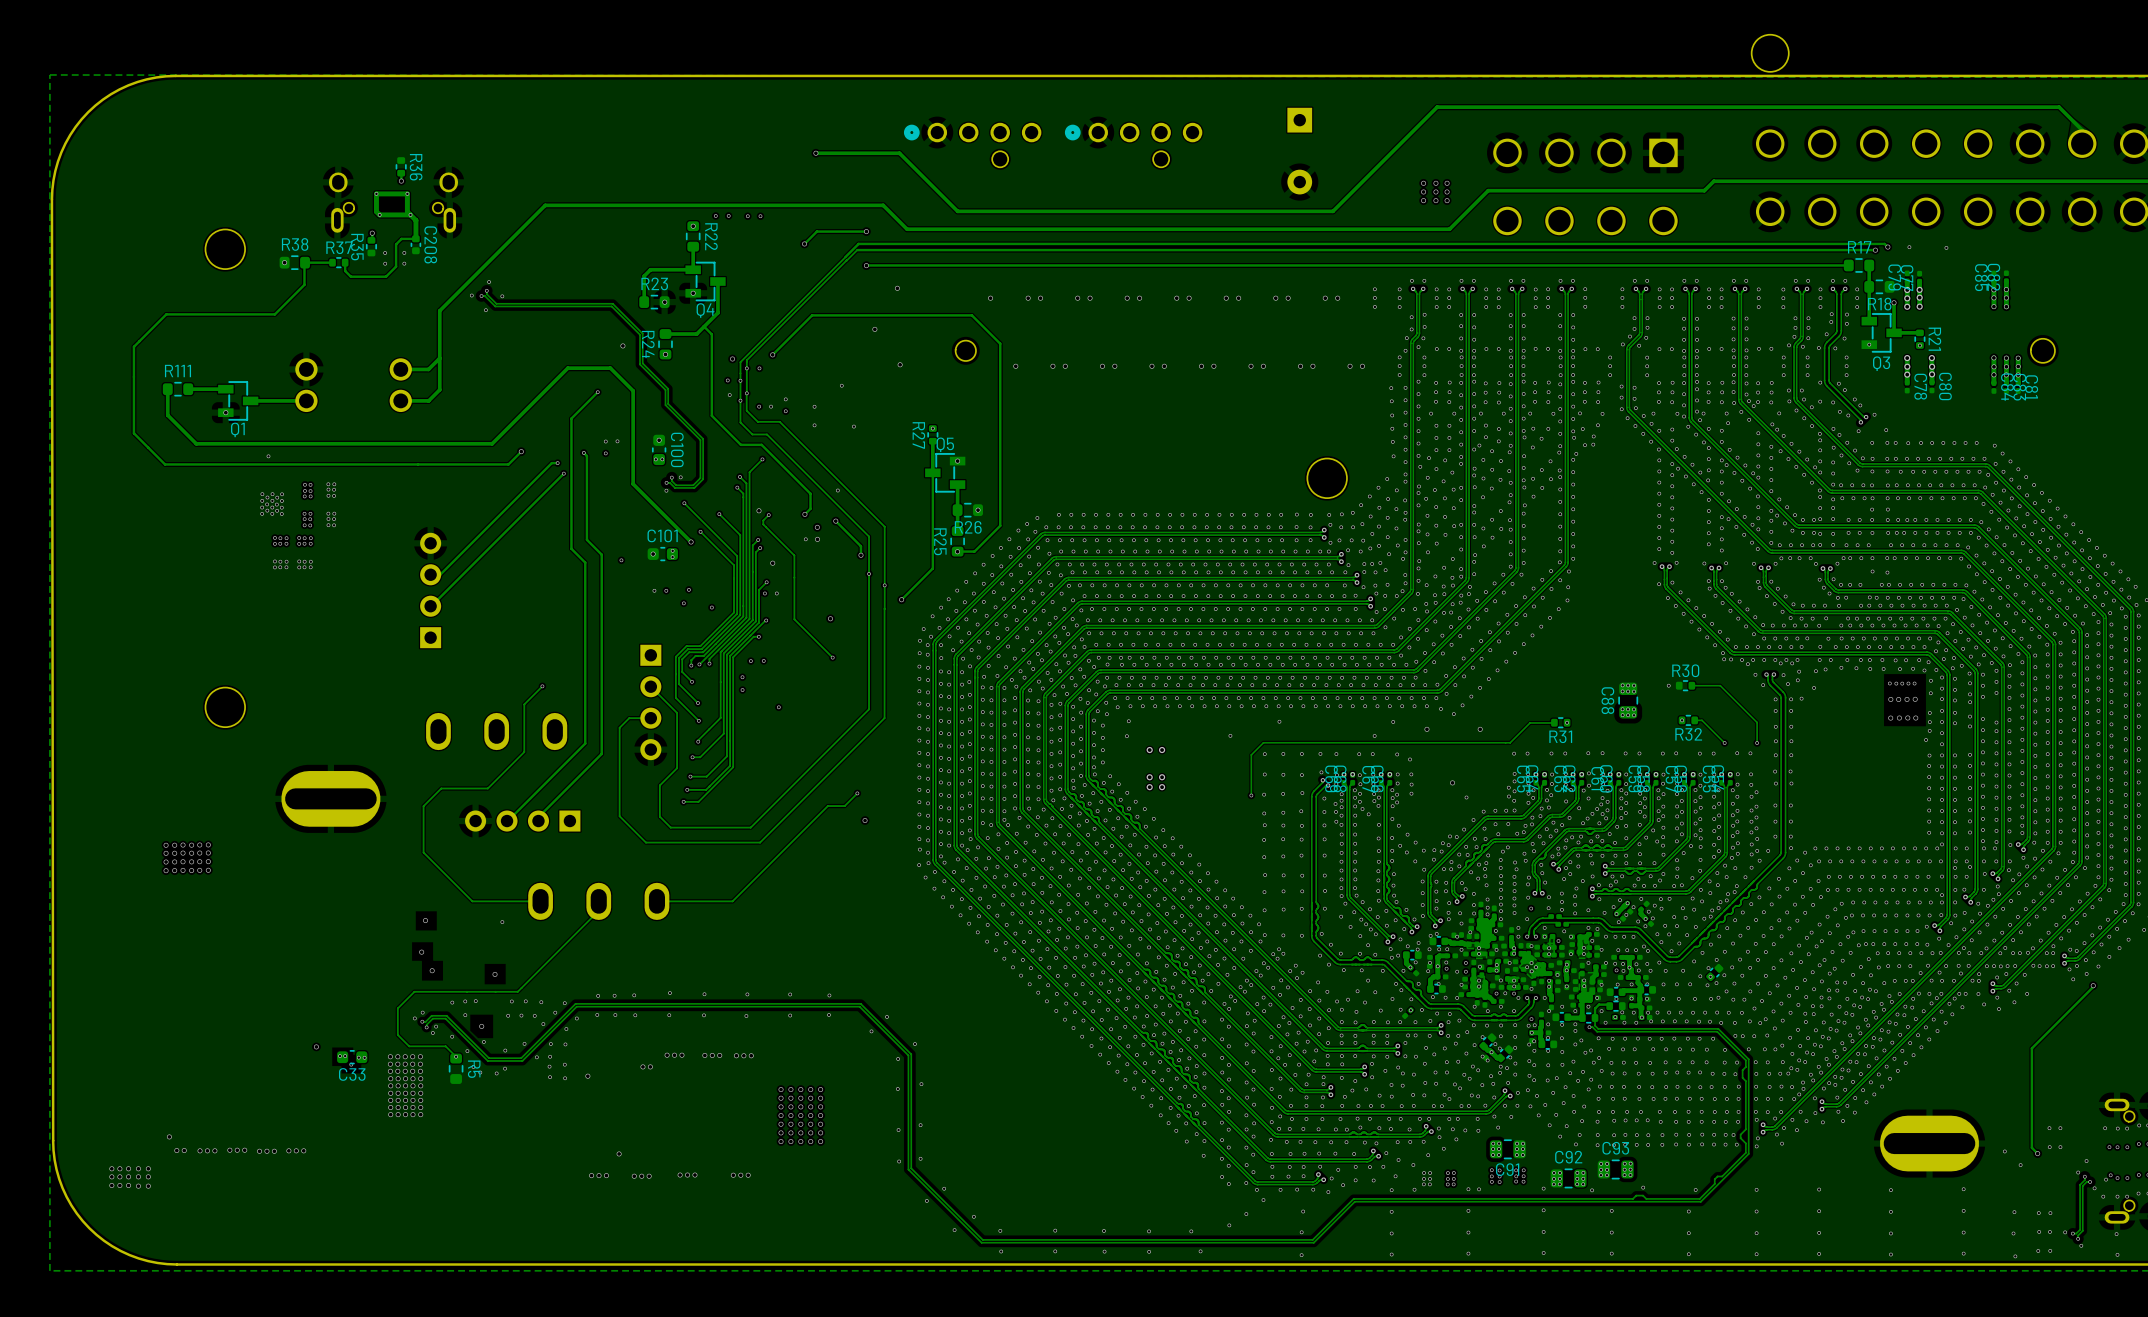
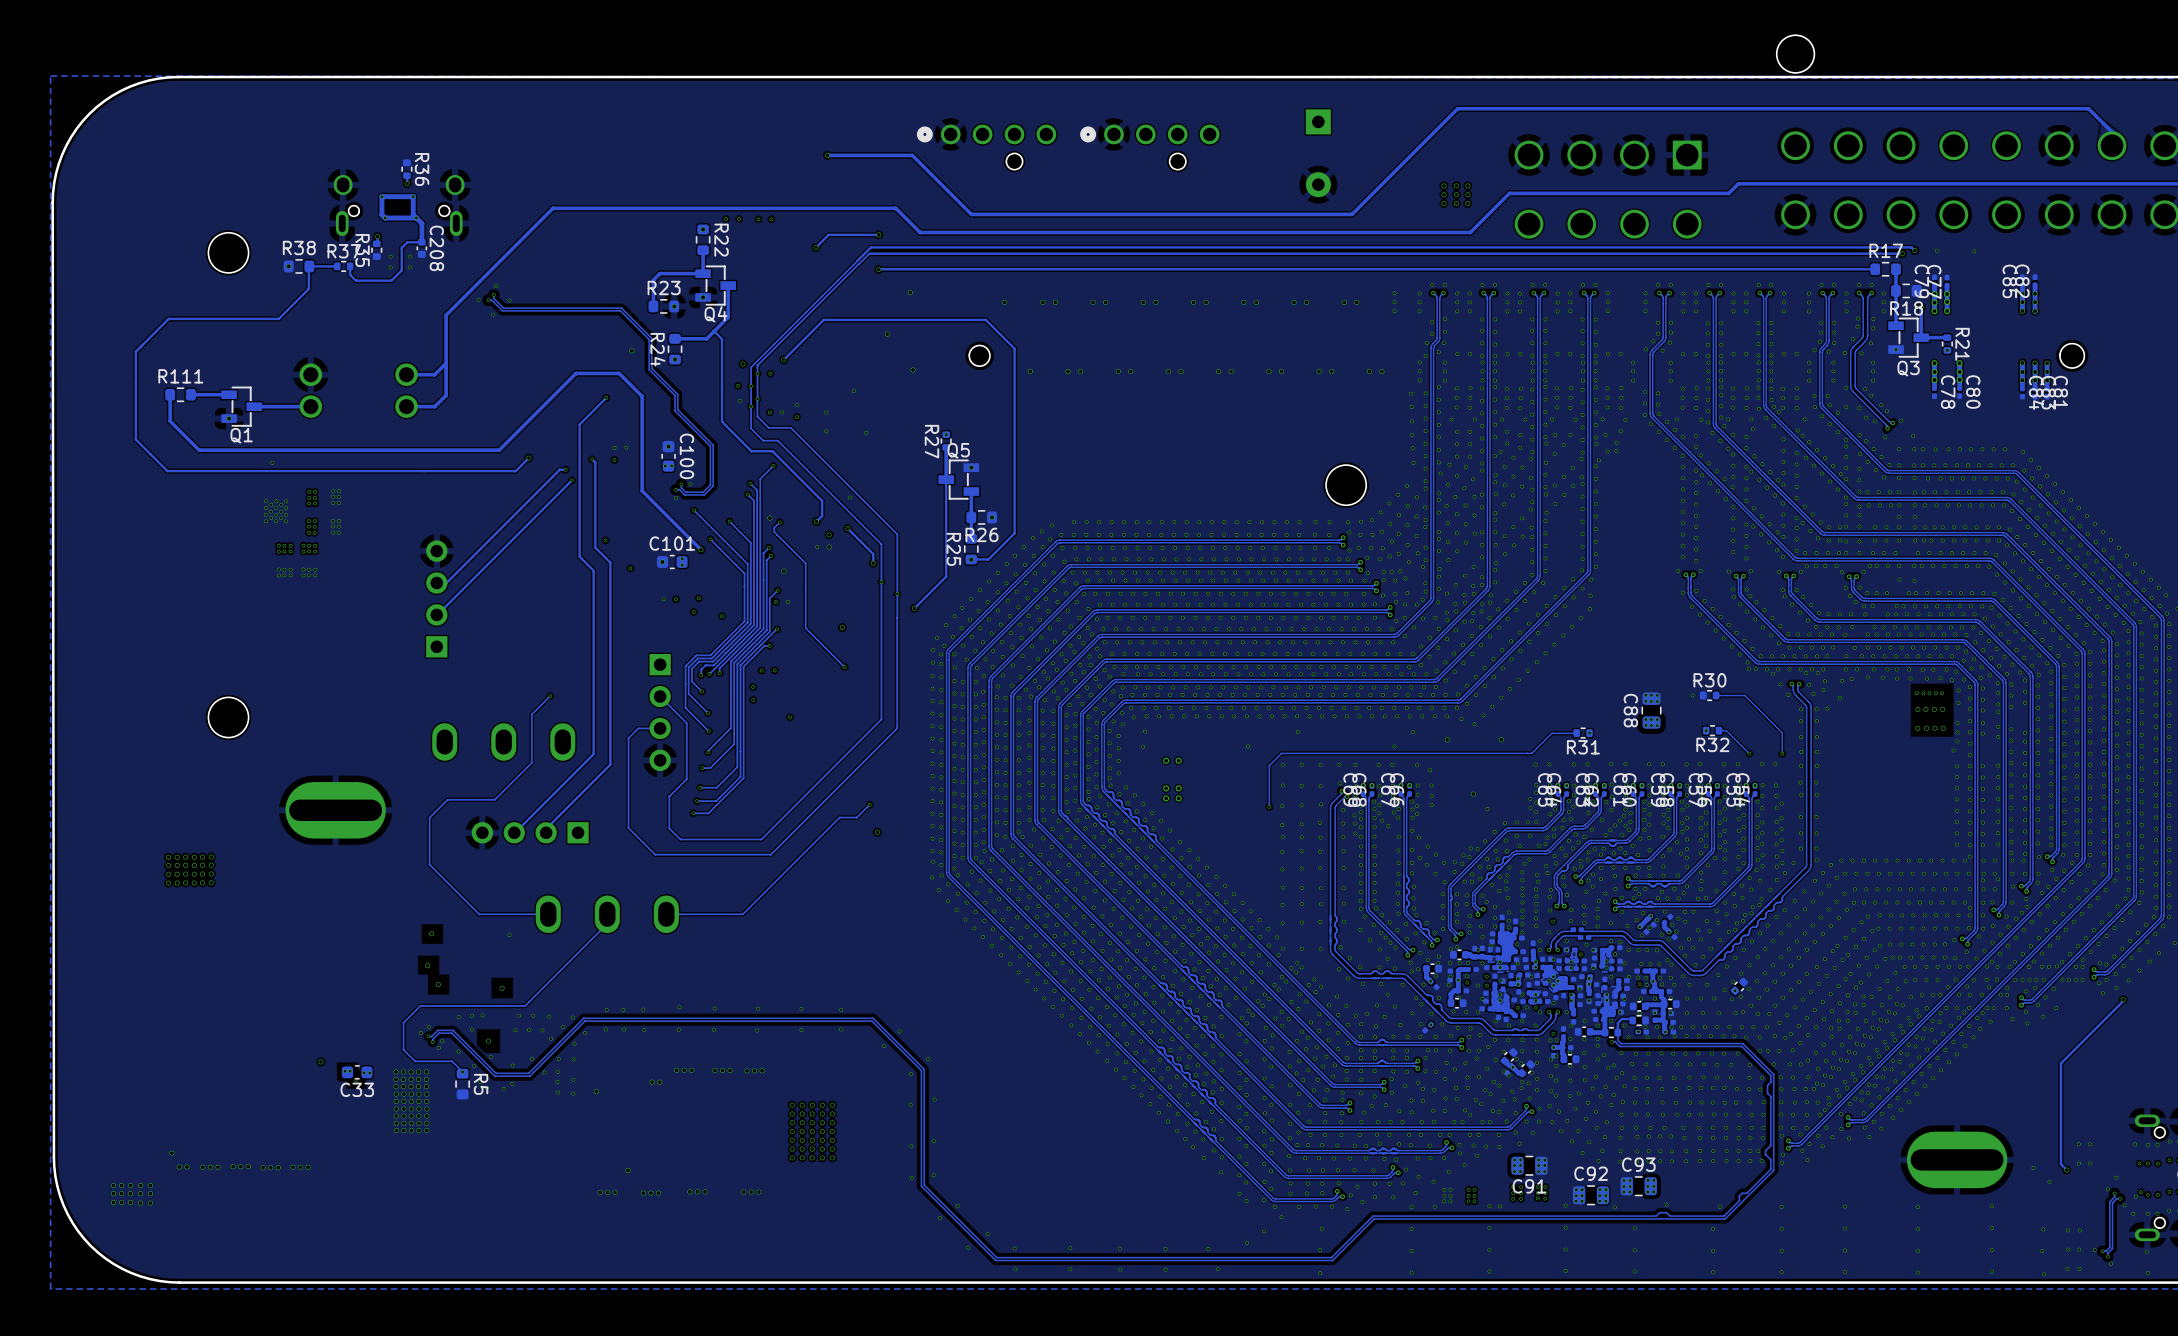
via: none -> (605, 540)

